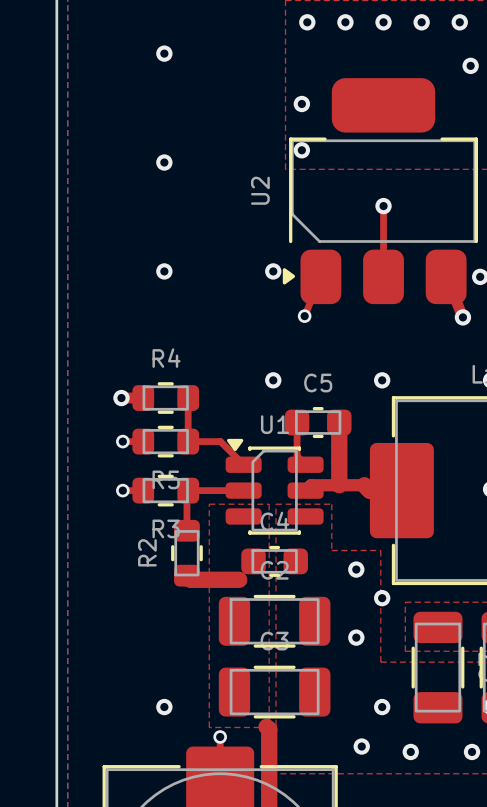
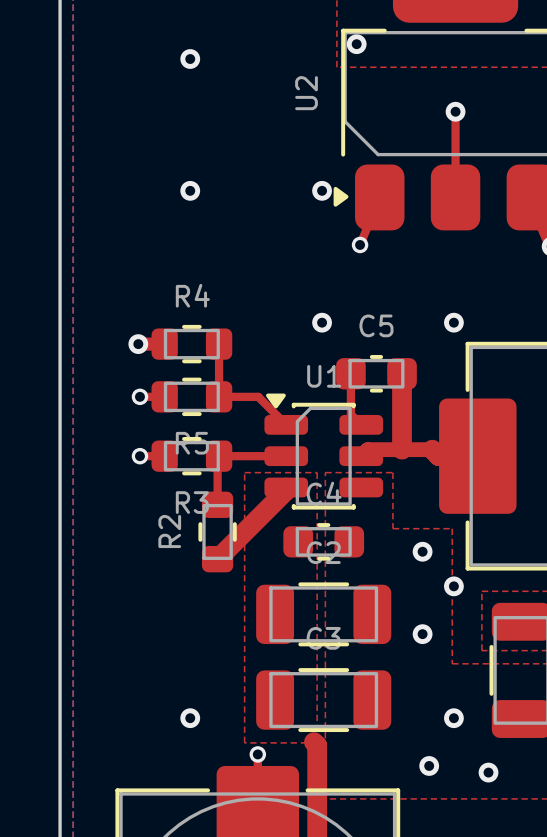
top track: (186, 575) (191, 579) (239, 579) -> (217, 559) (286, 490) (286, 487)

